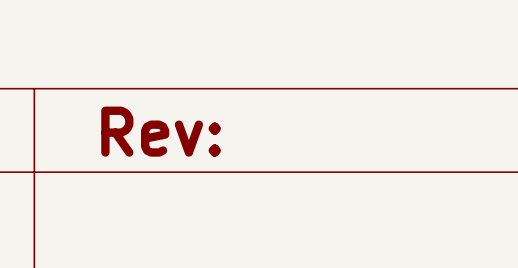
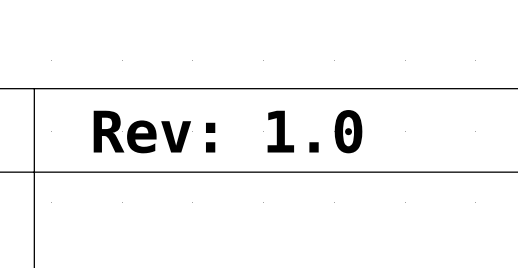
title block: Rev: (161, 131) -> Rev: 1.0 (228, 131)

